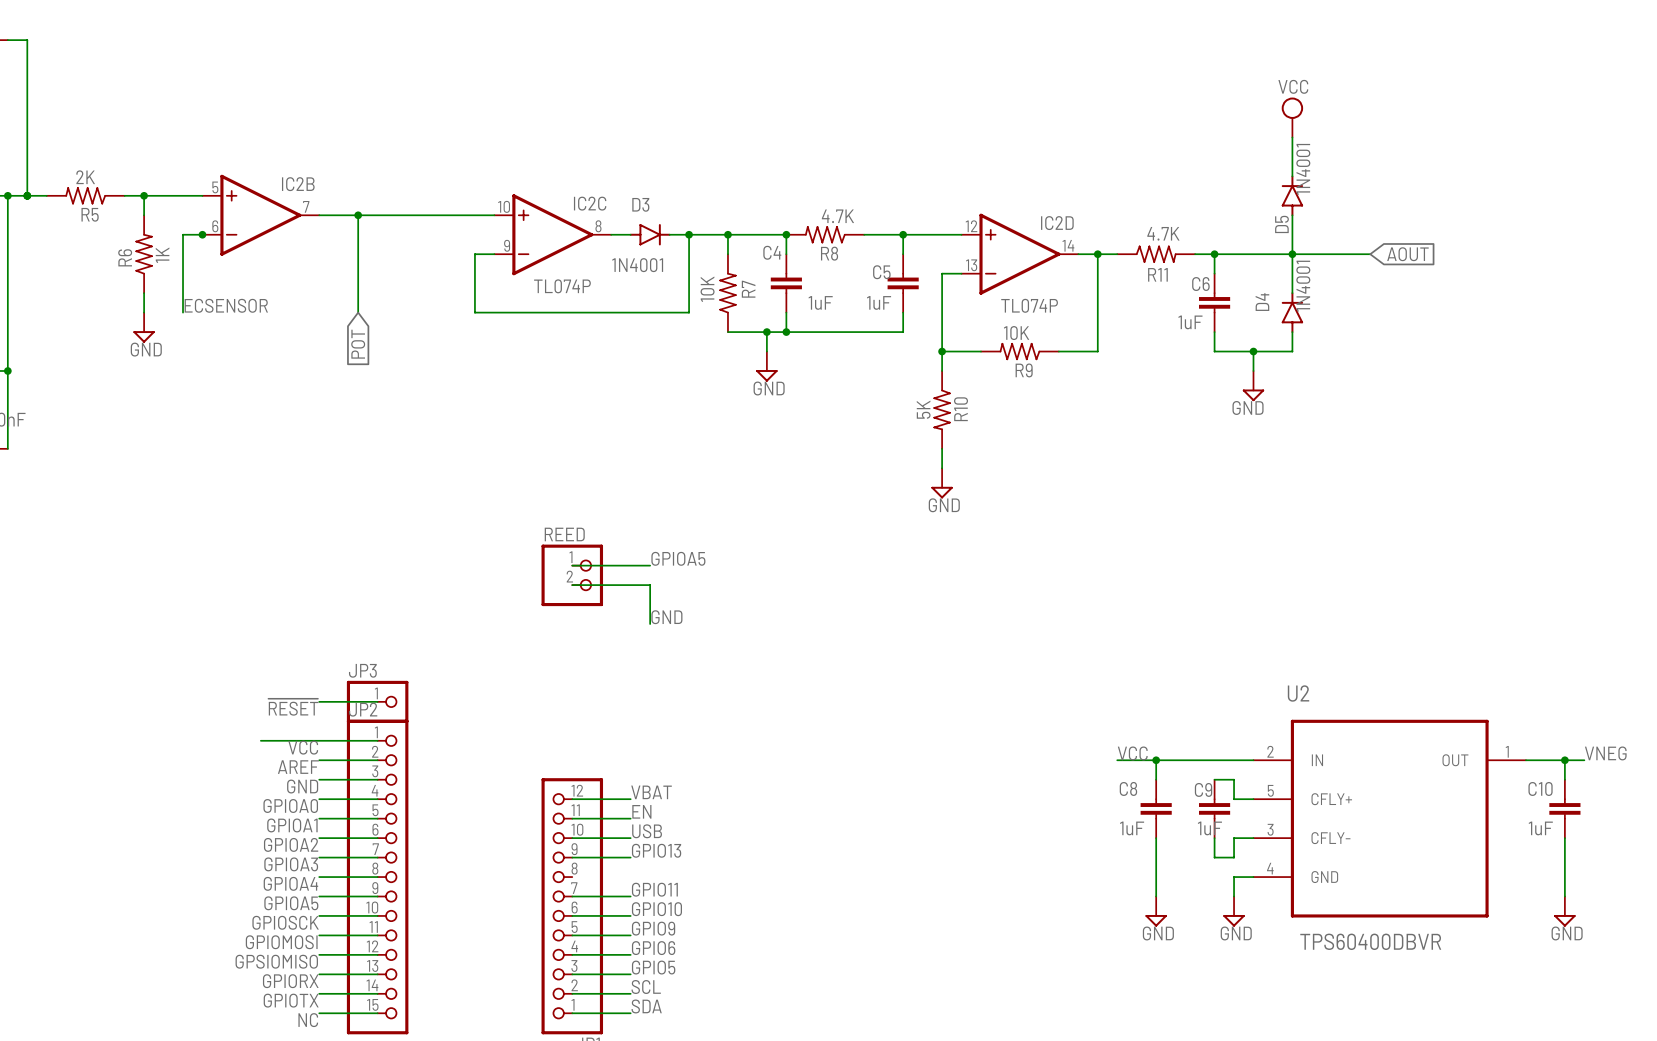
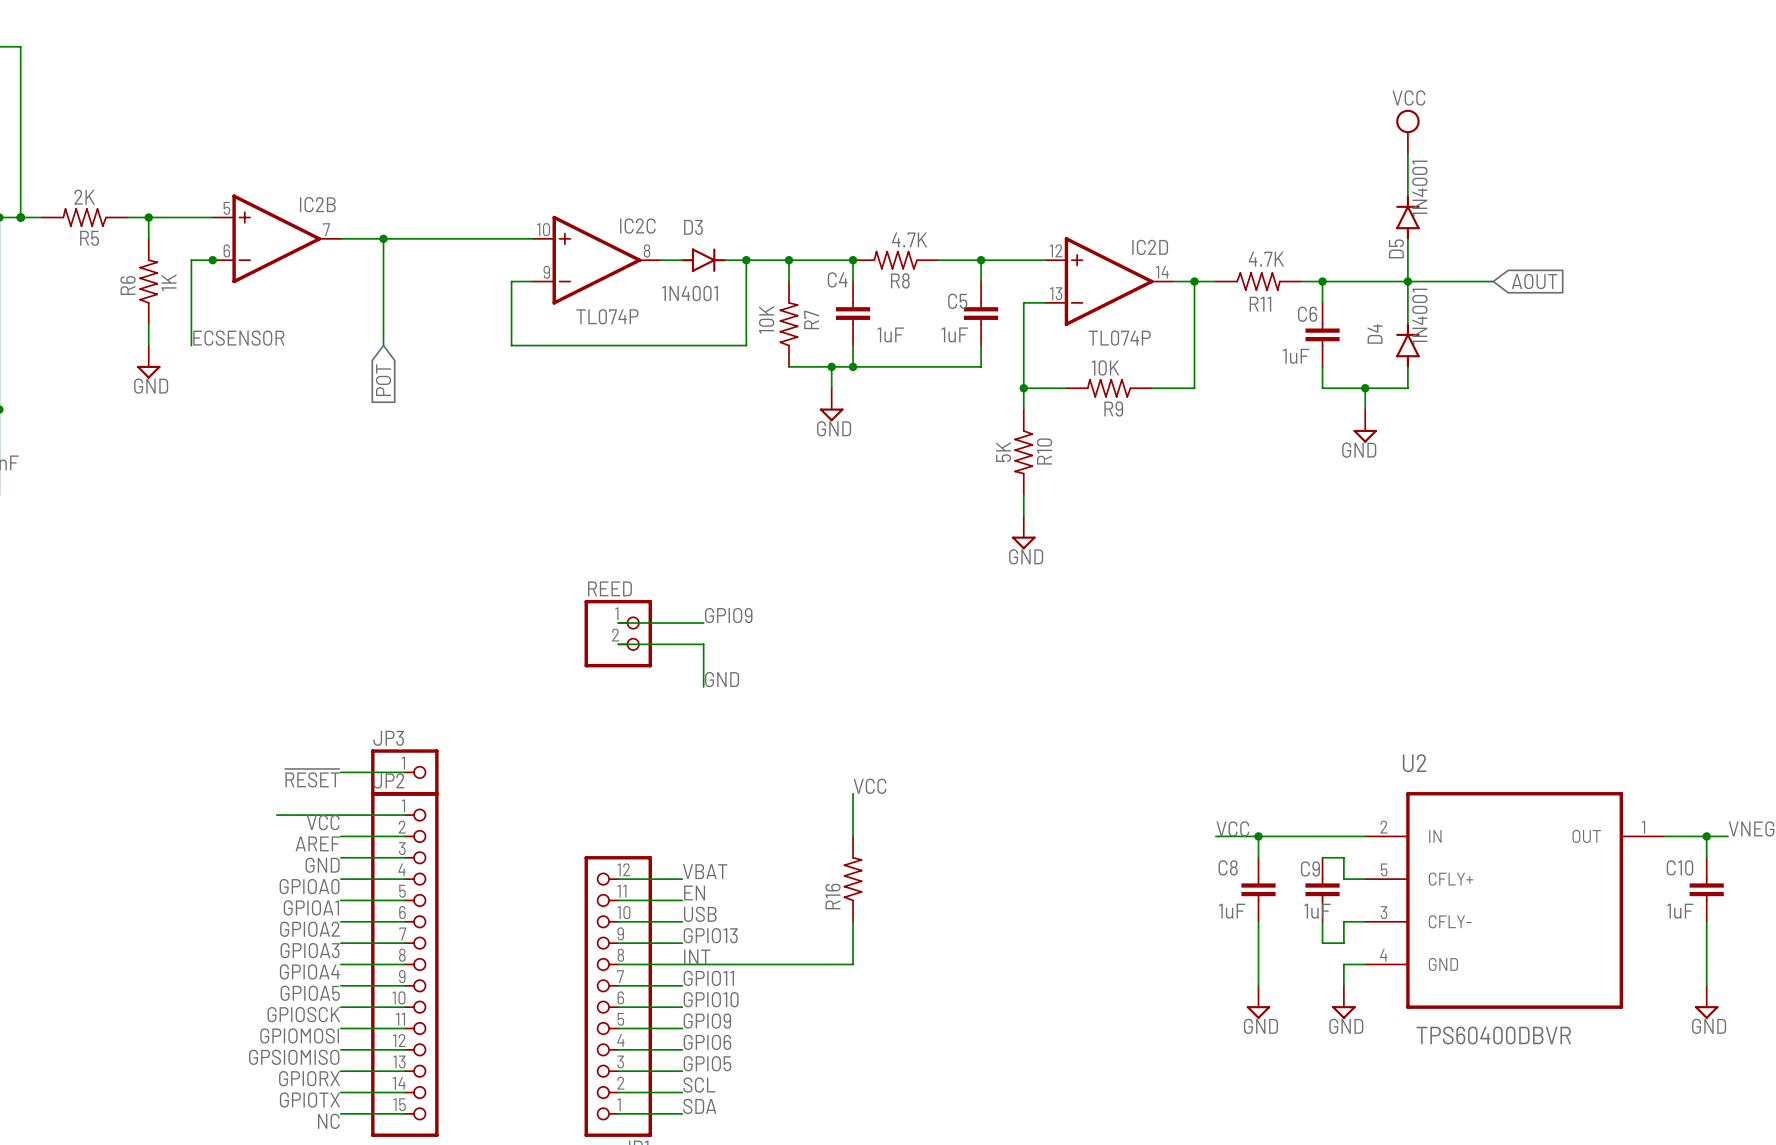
label: GPIOA5 (678, 558) -> GPIO9 (728, 615)
label: none -> VCC (870, 786)
wire: none -> (853, 793) (853, 836)
R16: none -> (853, 879)
wire: none -> (853, 921) (853, 964) (618, 964)
label: none -> INT (697, 957)

